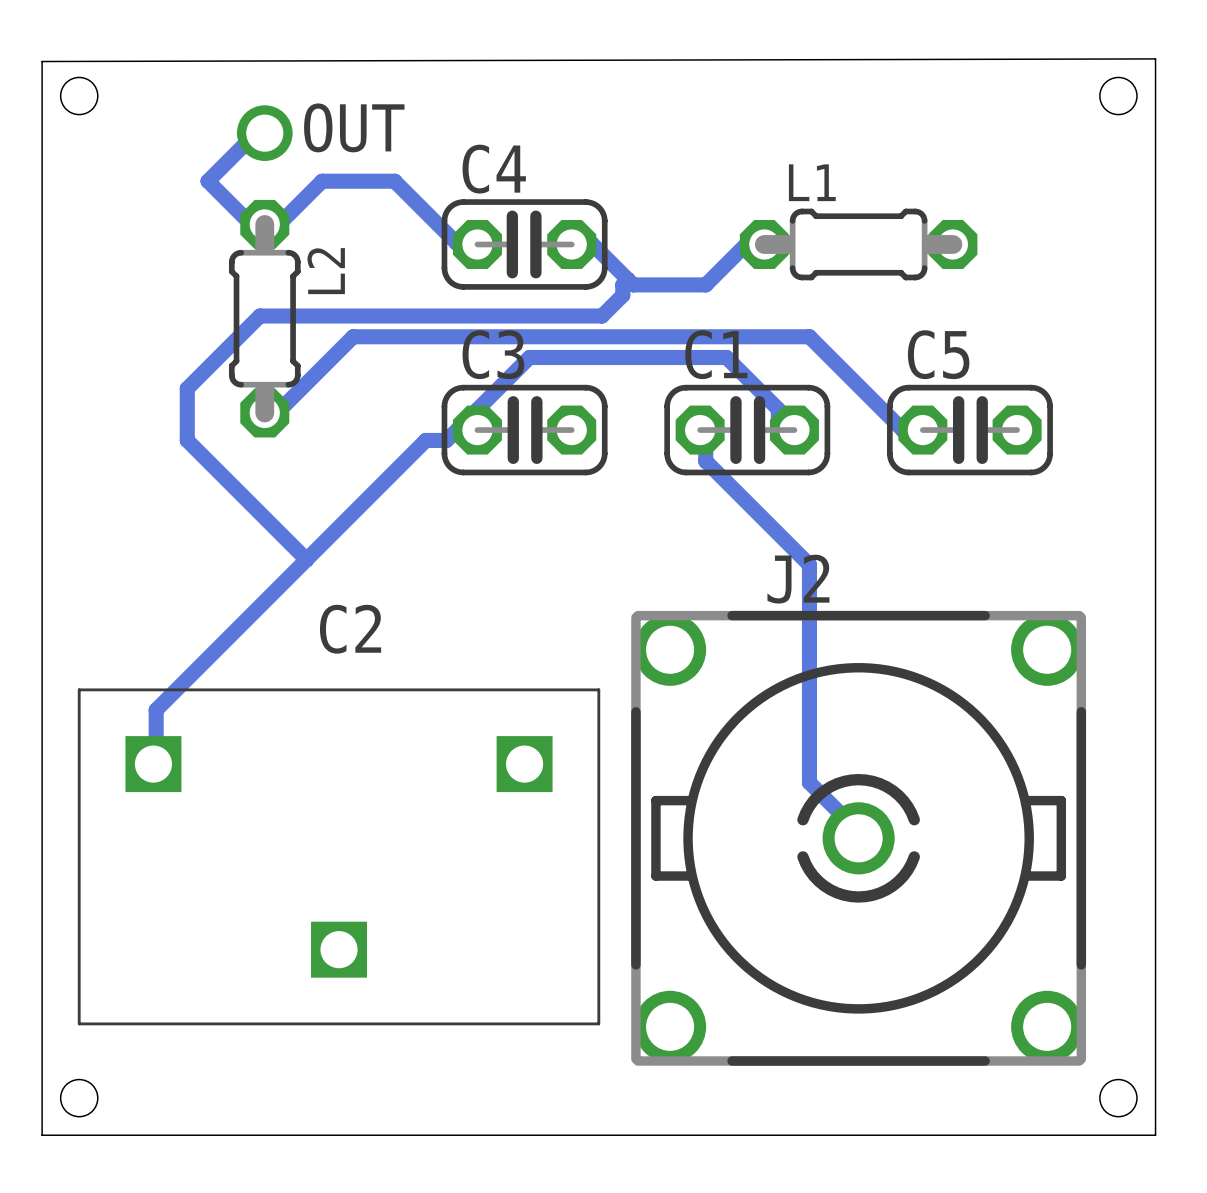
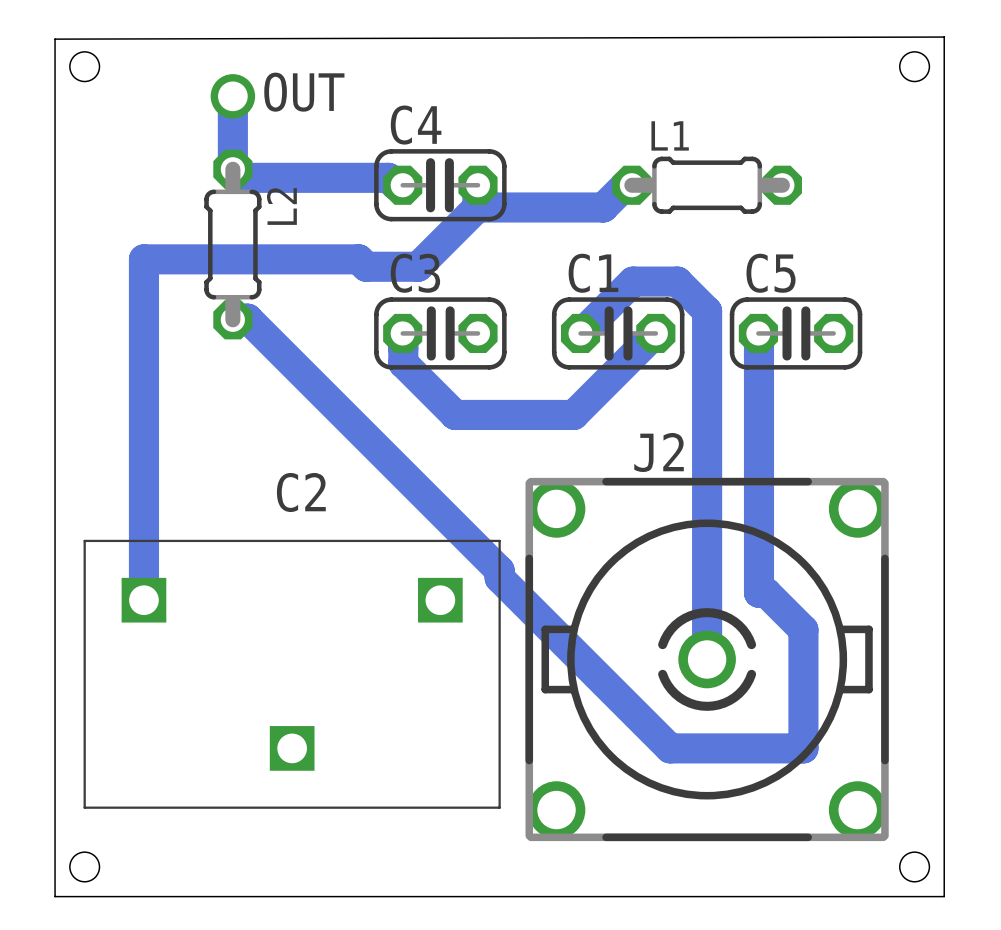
bottom track: (264, 133) (259, 139) (249, 139) (208, 181) (259, 233) (264, 224) (270, 233) (322, 181) (394, 181) (456, 243) (477, 244) -> (232, 96) (232, 169) (240, 177) (388, 177) (395, 185) (402, 185)
bottom track: (571, 244) (591, 243) (633, 284) (705, 284) (757, 233) (767, 243) (764, 244) -> (477, 207) (603, 207) (625, 185) (631, 185)
bottom track: (628, 279) (622, 284) (622, 295) (602, 316) (259, 316) (187, 388) (187, 440) (306, 559) -> none
bottom track: (264, 412) (270, 419) (353, 336) (809, 336) (902, 430) (922, 430) -> (232, 319) (247, 318) (499, 570) (499, 577) (670, 748) (803, 748) (803, 629) (766, 592) (758, 592) (758, 333)
bottom track: none -> (402, 333) (403, 363) (455, 414) (573, 414) (655, 333)
bottom track: (700, 430) (705, 430) (705, 461) (809, 564) (809, 782) (861, 834) (858, 838) -> (581, 333) (633, 281) (677, 281) (707, 311) (707, 659)
bottom track: (794, 430) (778, 430) (778, 409) (726, 357) (529, 357) (477, 409) (477, 430) (467, 419) (446, 440) (425, 440) (156, 710) (156, 761) (153, 764) -> (477, 207) (418, 266) (366, 266) (358, 259) (143, 259) (143, 600)

